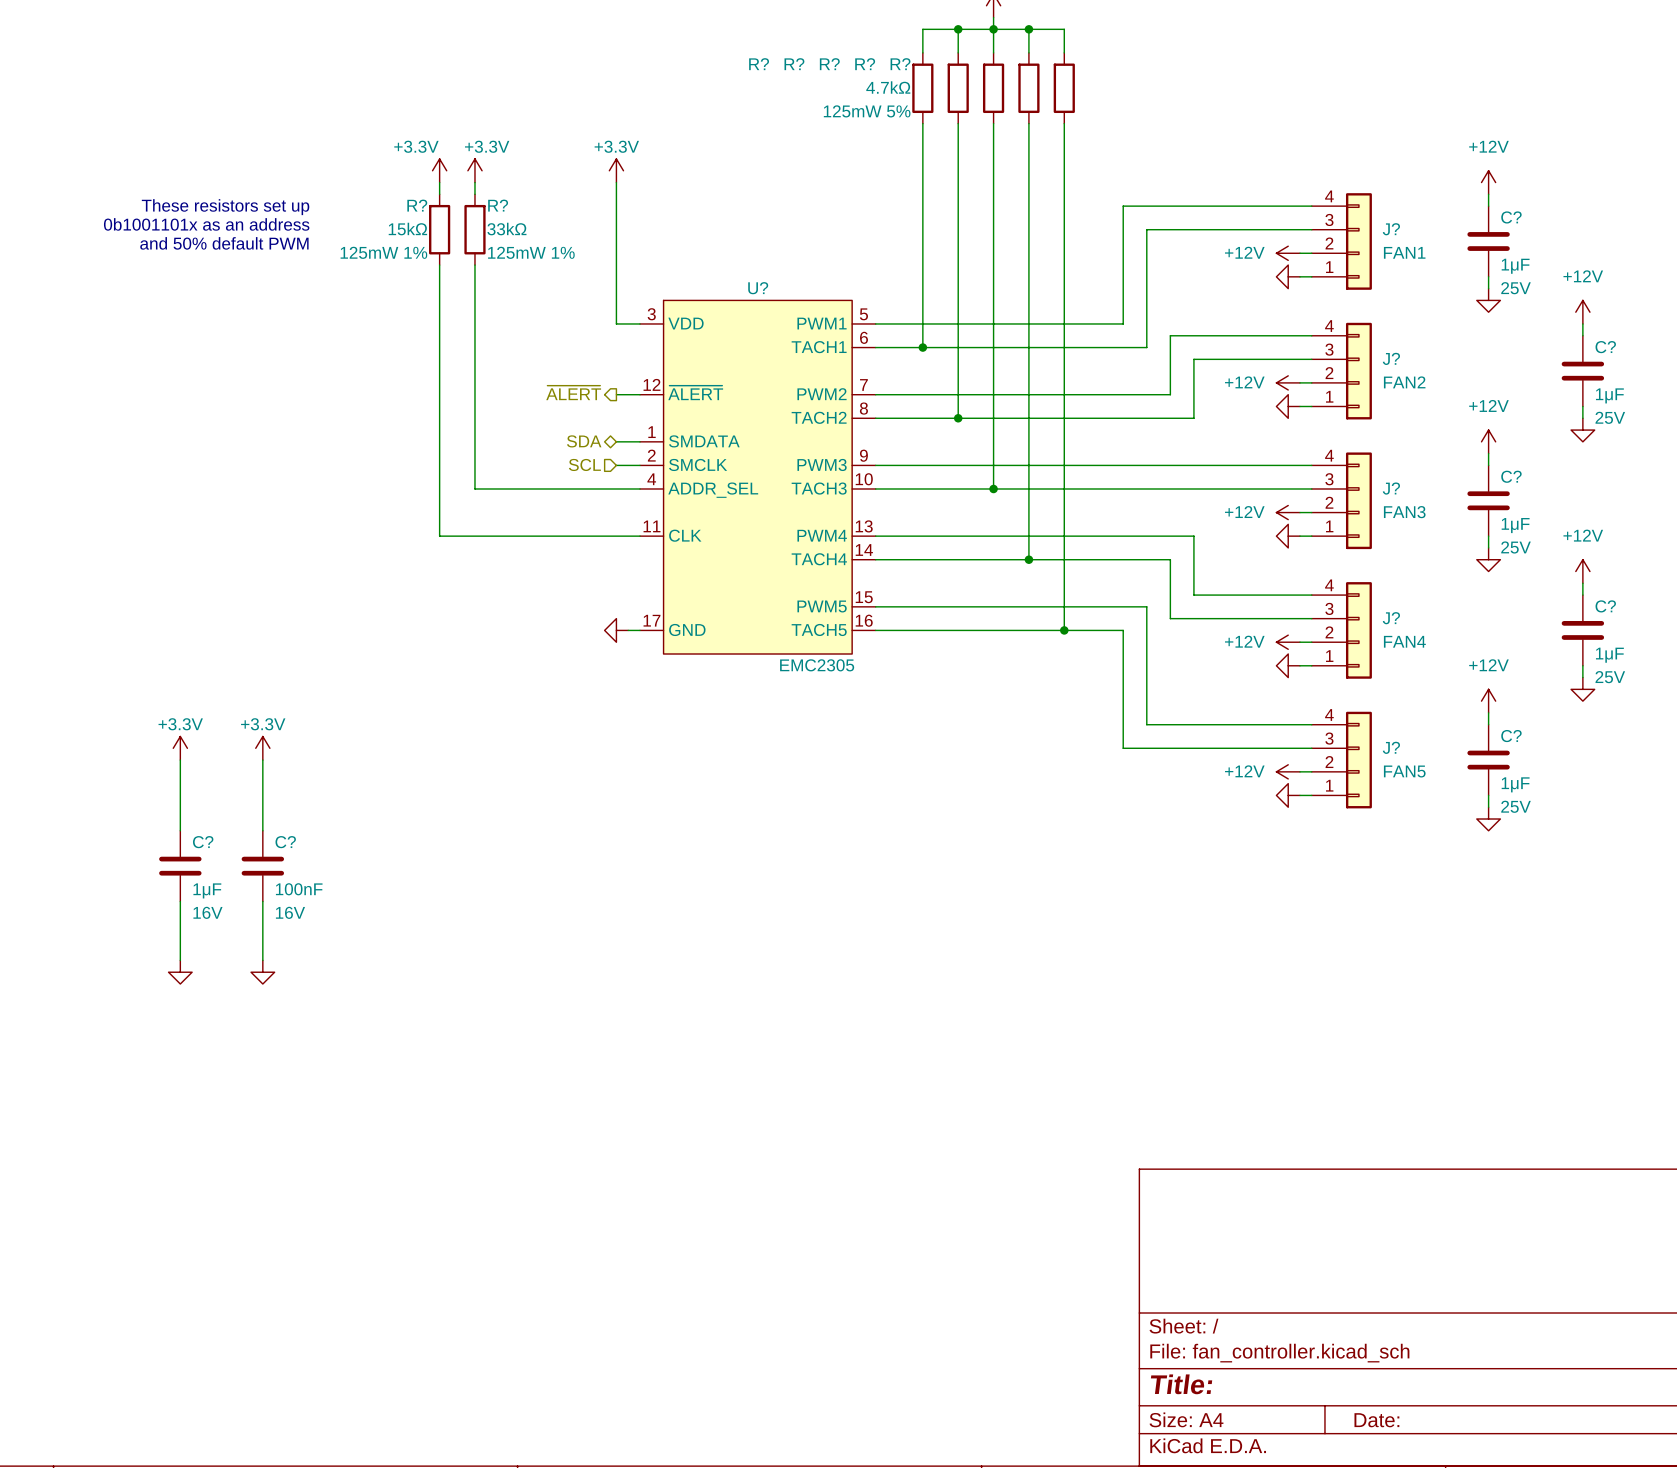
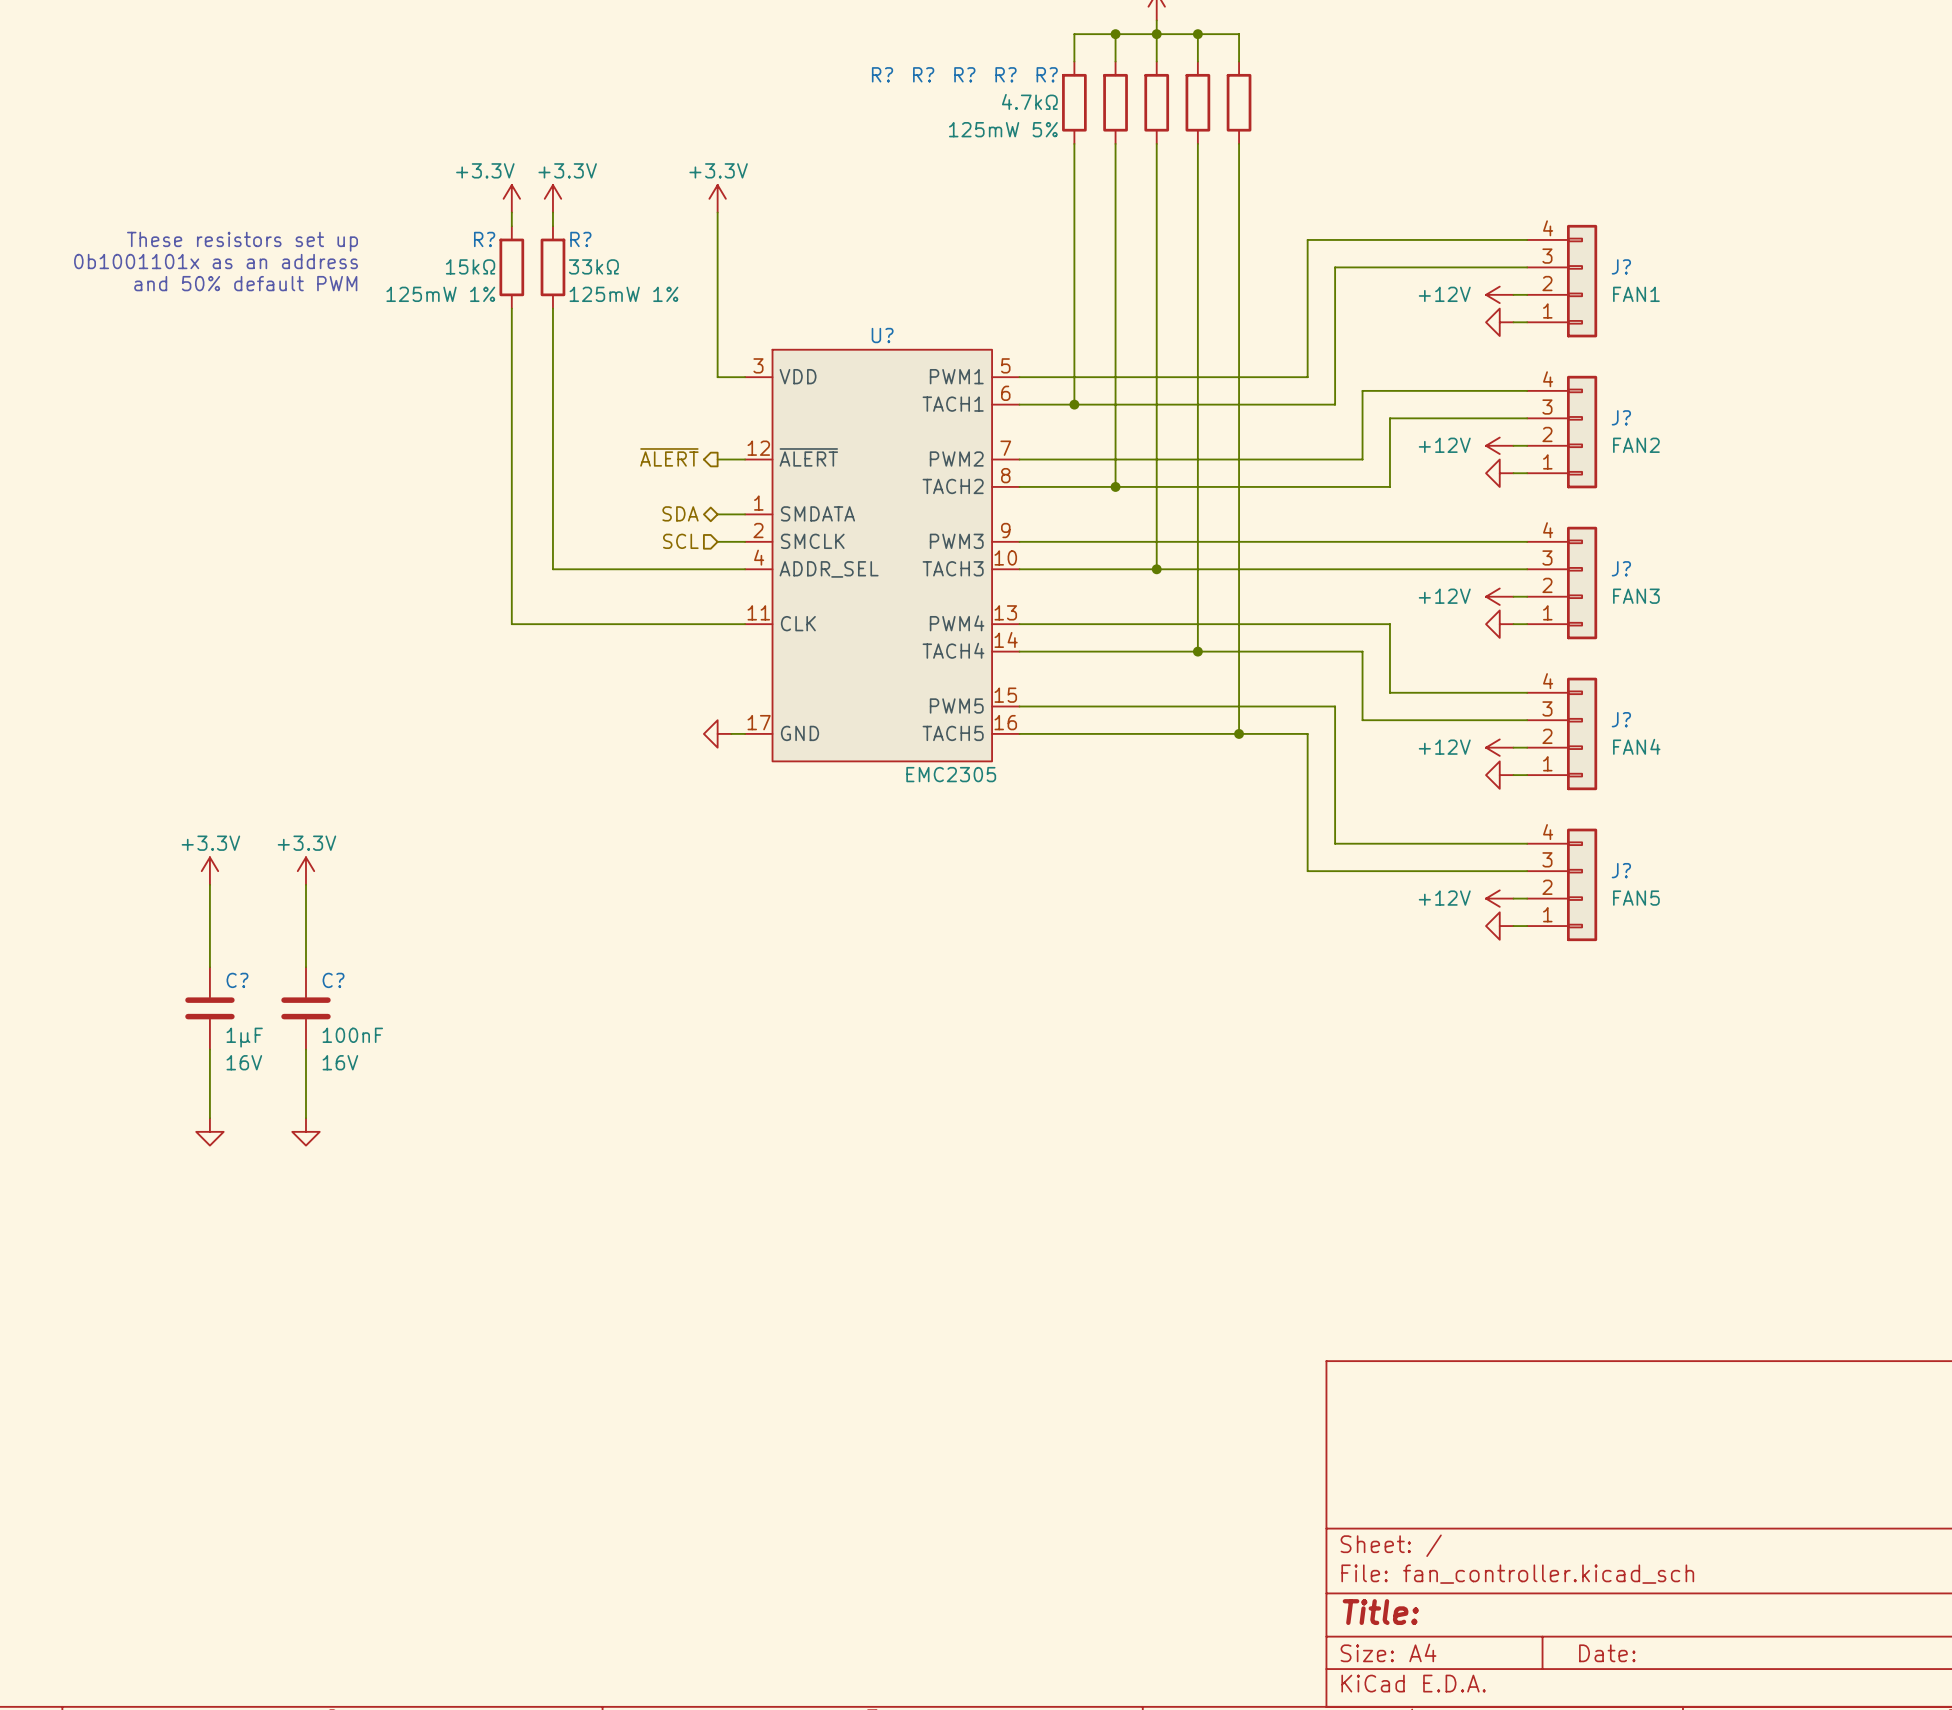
power symbol: +12V (1488, 182) -> none
wire: (1488, 194) (1488, 206) -> none
C?: 1μF (1488, 241) -> none
wire: (1488, 276) (1488, 288) -> none
power symbol: (1488, 300) -> none
power symbol: +12V (1582, 312) -> none
wire: (1582, 323) (1582, 335) -> none
C?: 1μF (1582, 371) -> none
wire: (1582, 406) (1582, 418) -> none
power symbol: (1582, 430) -> none
power symbol: +12V (1488, 441) -> none
wire: (1488, 453) (1488, 465) -> none
C?: 1μF (1488, 500) -> none
wire: (1488, 536) (1488, 547) -> none
power symbol: (1488, 559) -> none
power symbol: +12V (1582, 571) -> none
wire: (1582, 583) (1582, 595) -> none
C?: 1μF (1582, 630) -> none
wire: (1582, 665) (1582, 677) -> none
power symbol: (1582, 689) -> none
power symbol: +12V (1488, 701) -> none
wire: (1488, 712) (1488, 724) -> none
C?: 1μF (1488, 760) -> none
wire: (1488, 795) (1488, 807) -> none
power symbol: (1488, 819) -> none

